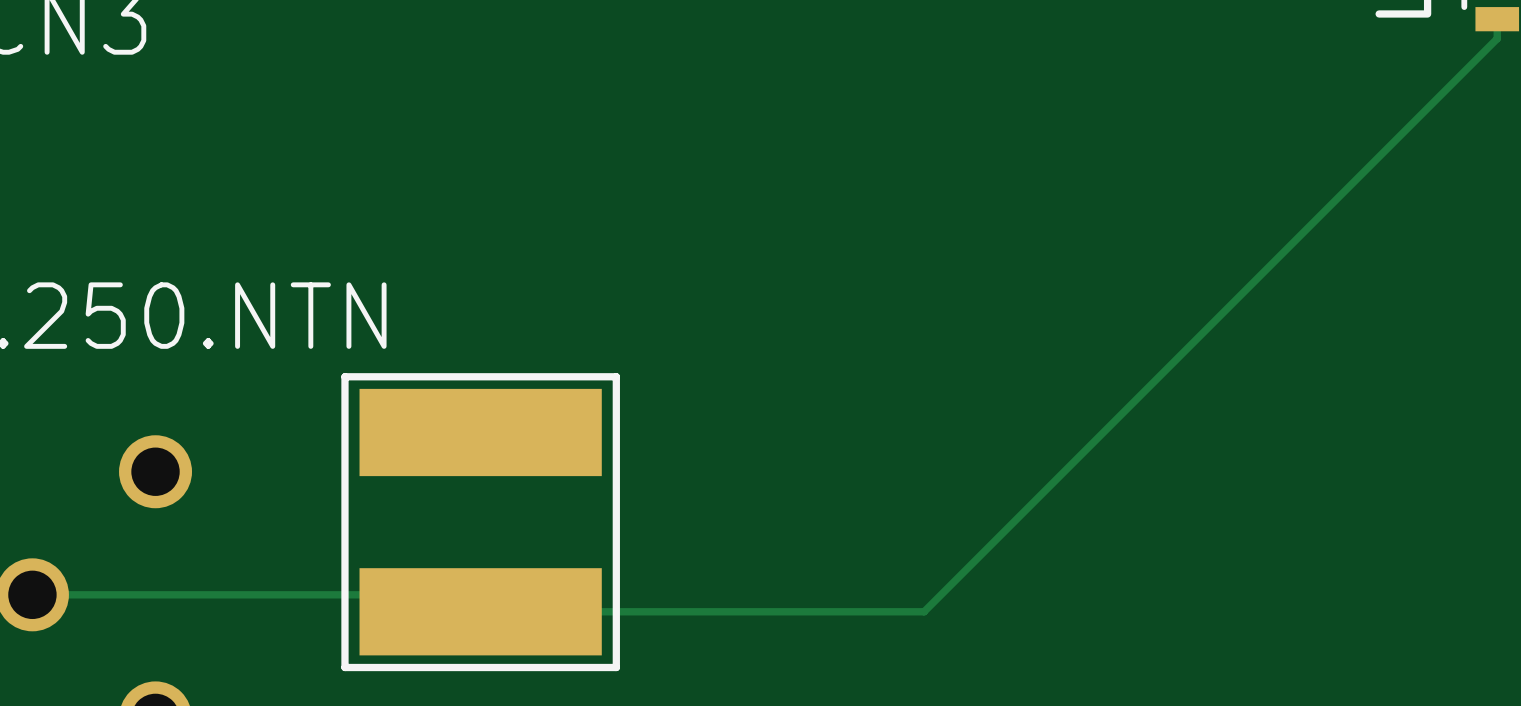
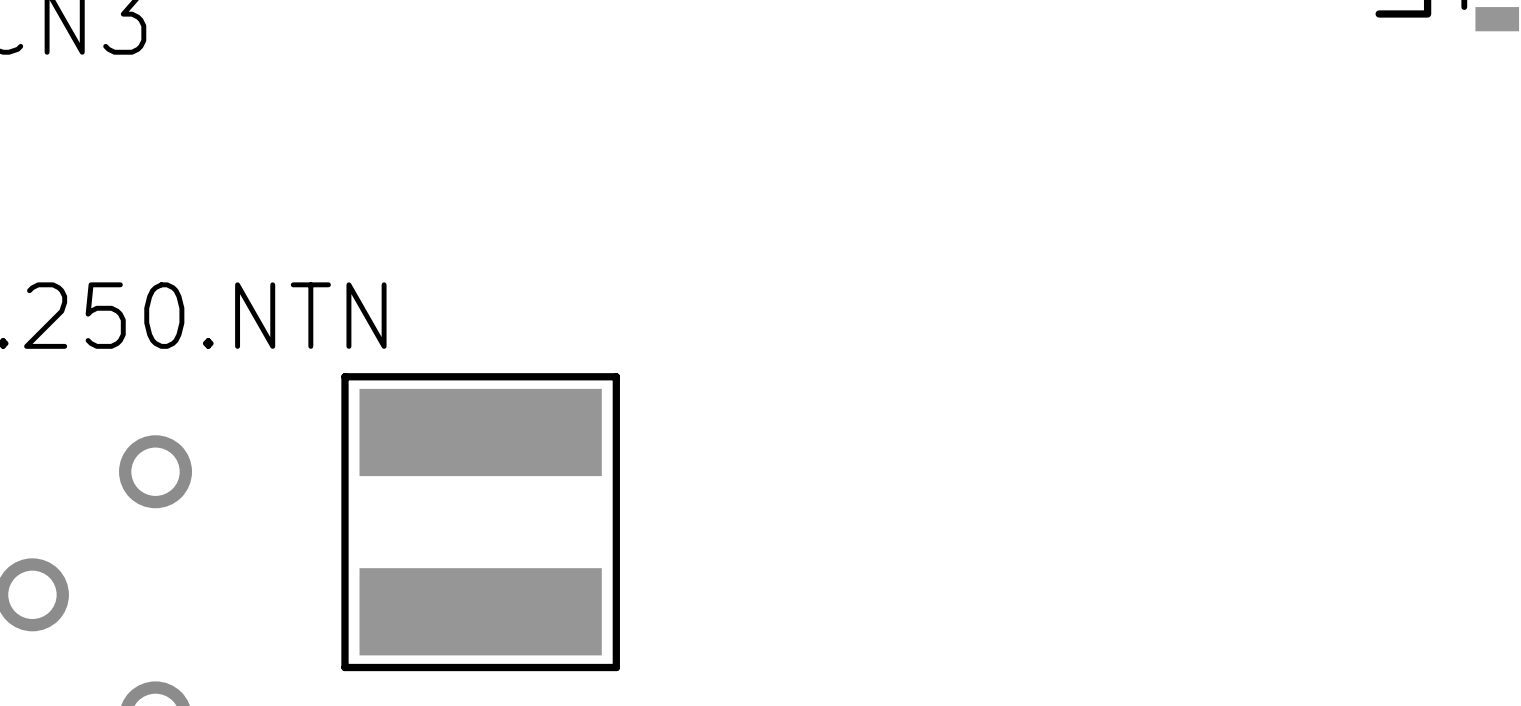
track: (1497, 19) (1497, 38) (924, 611) (480, 611) (463, 594) (32, 594) -> none

